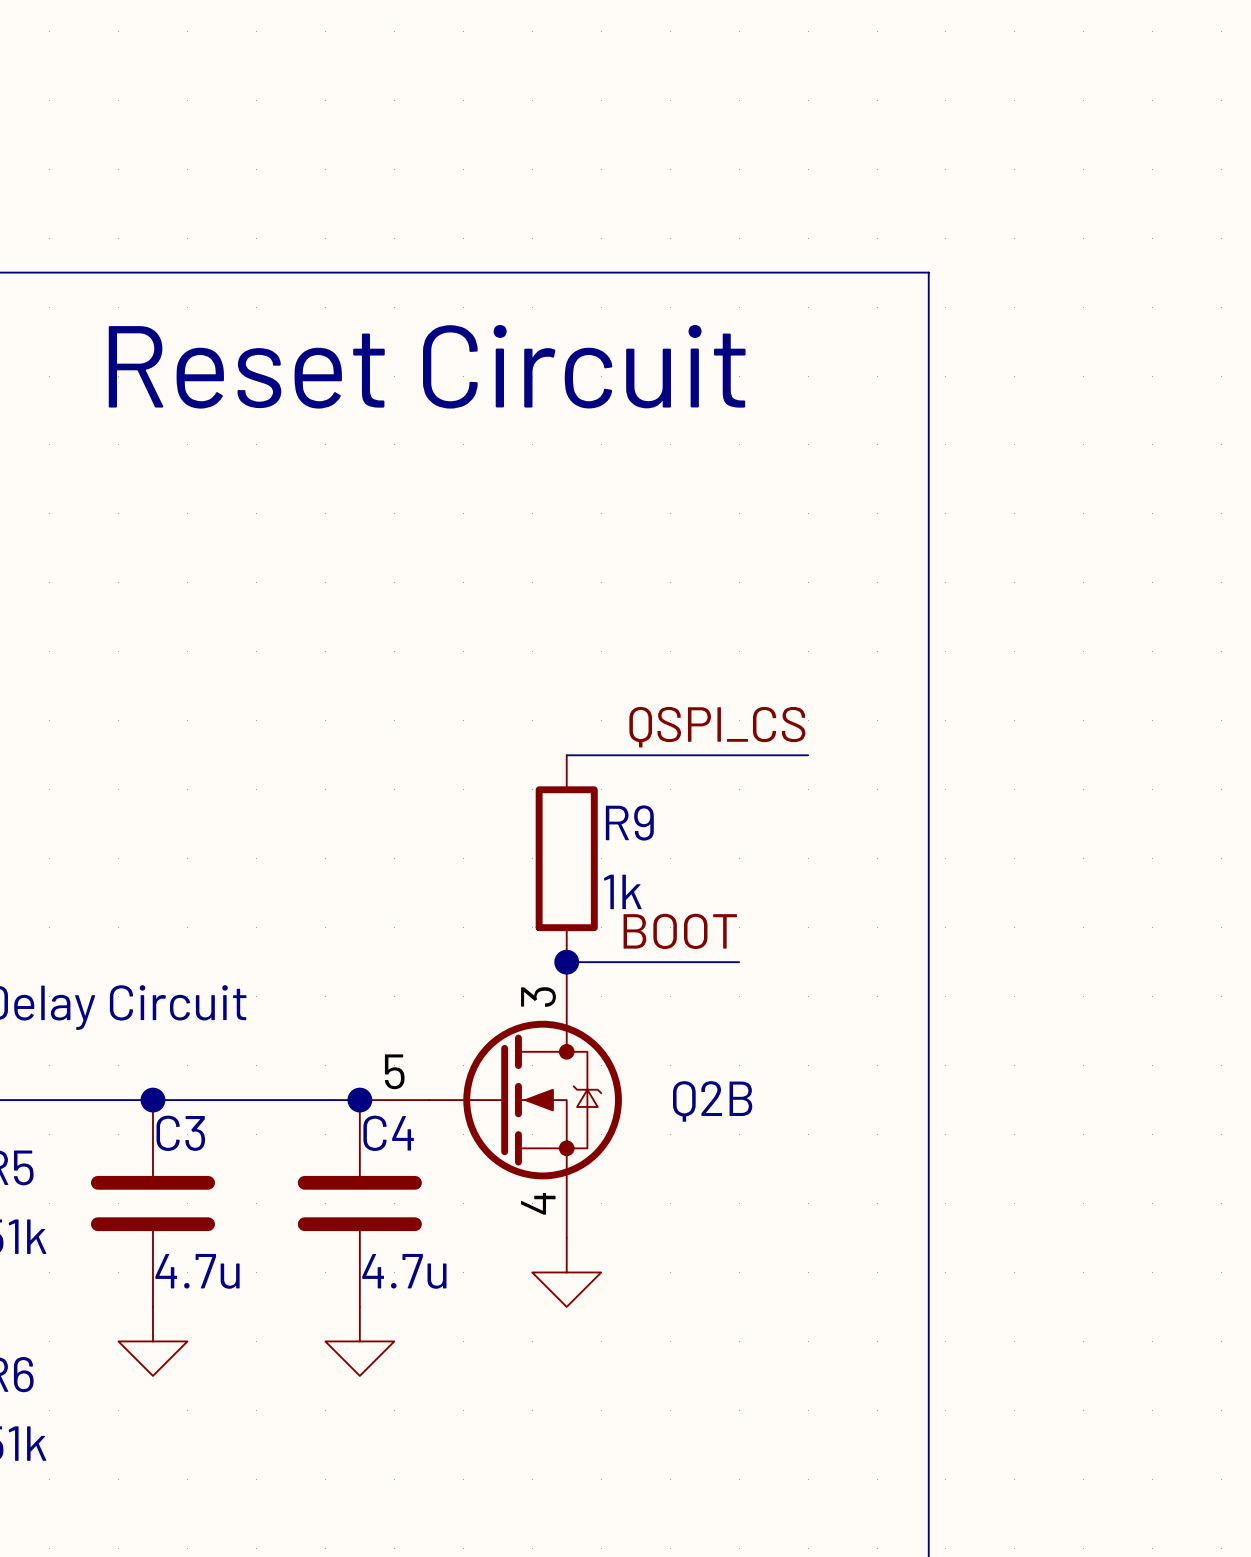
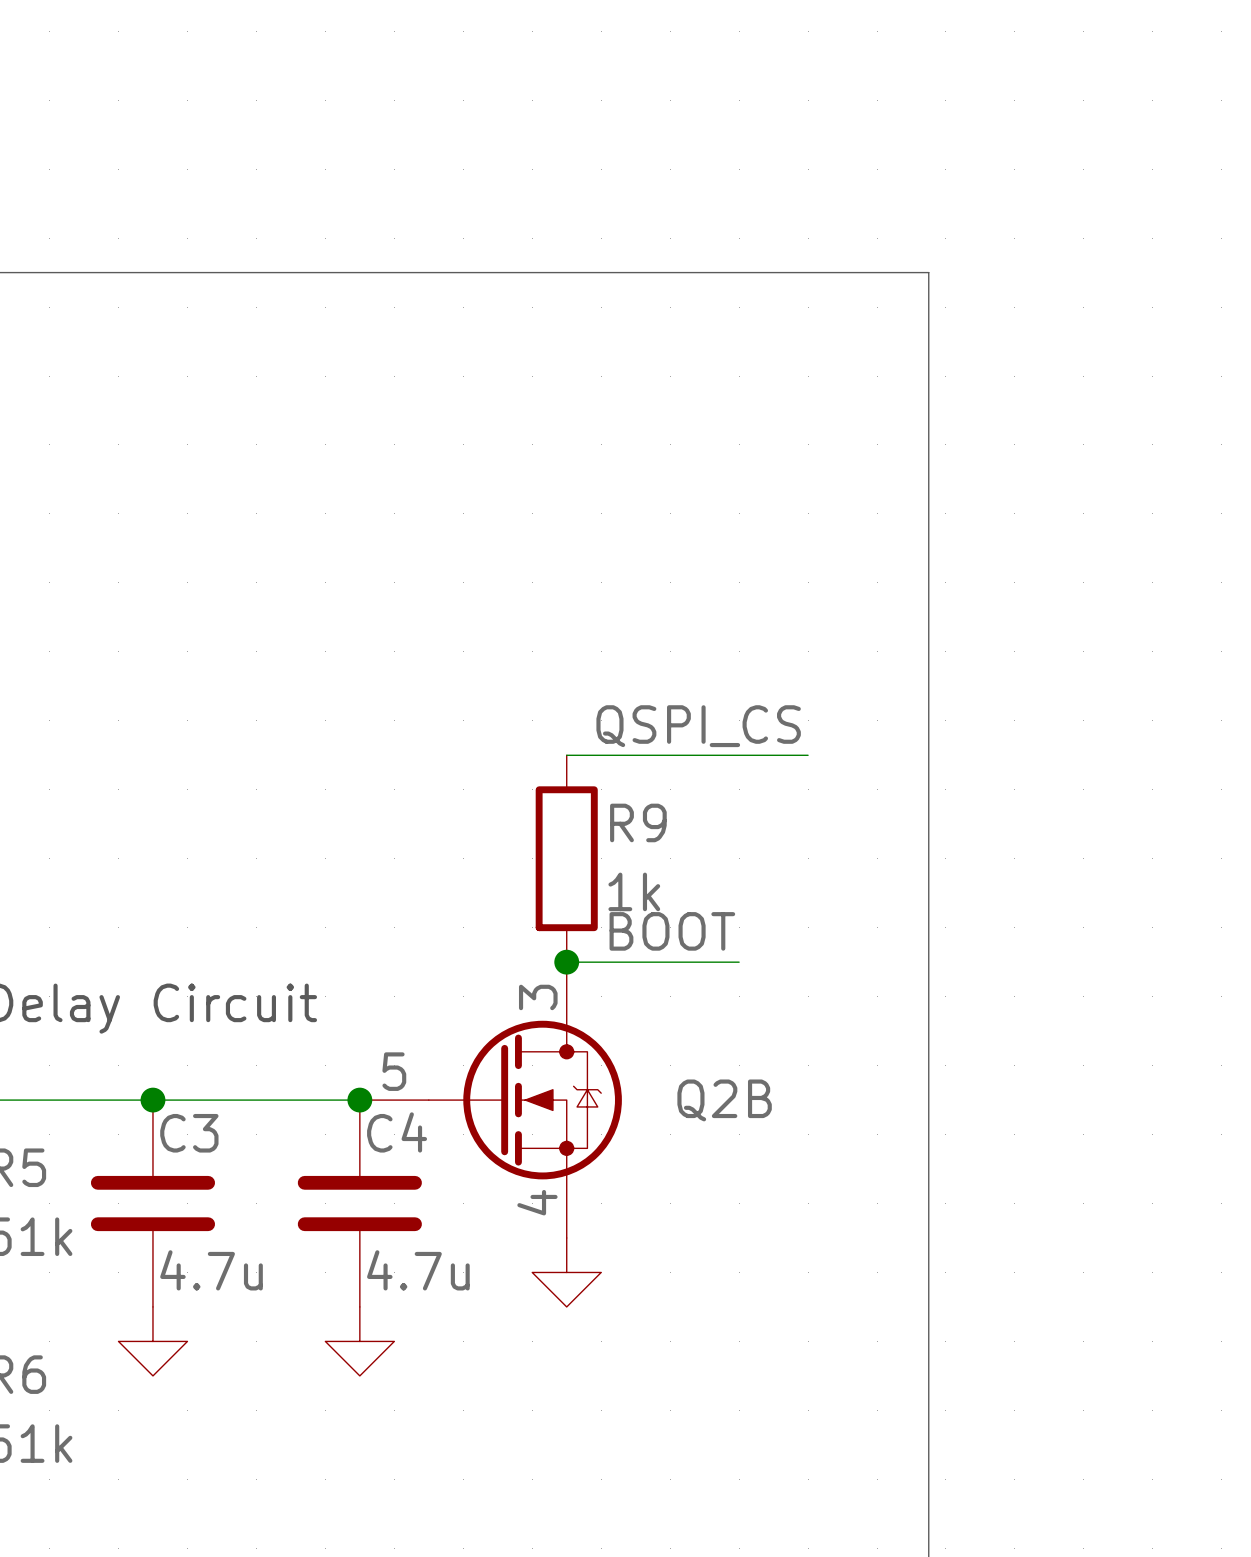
text: Reset Circuit (427, 366) -> none

